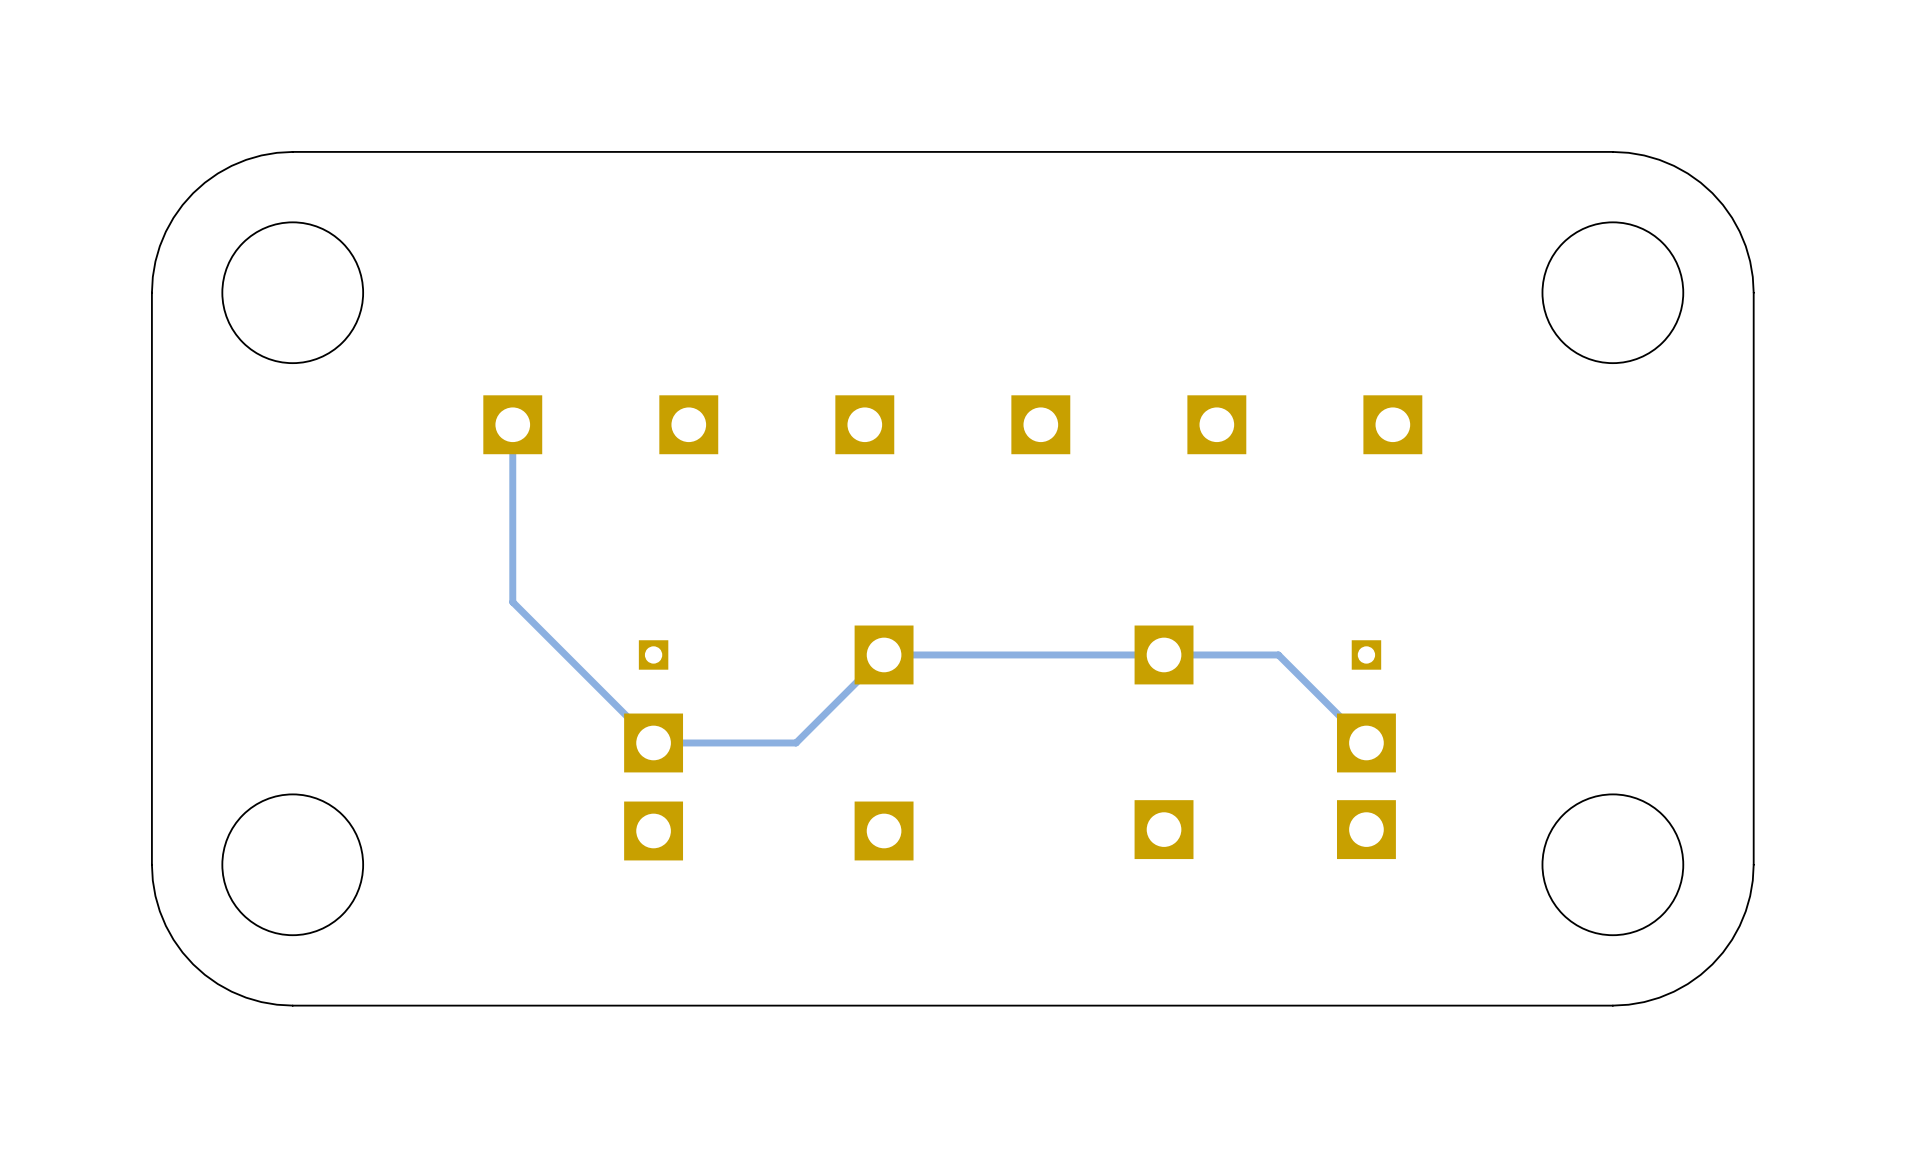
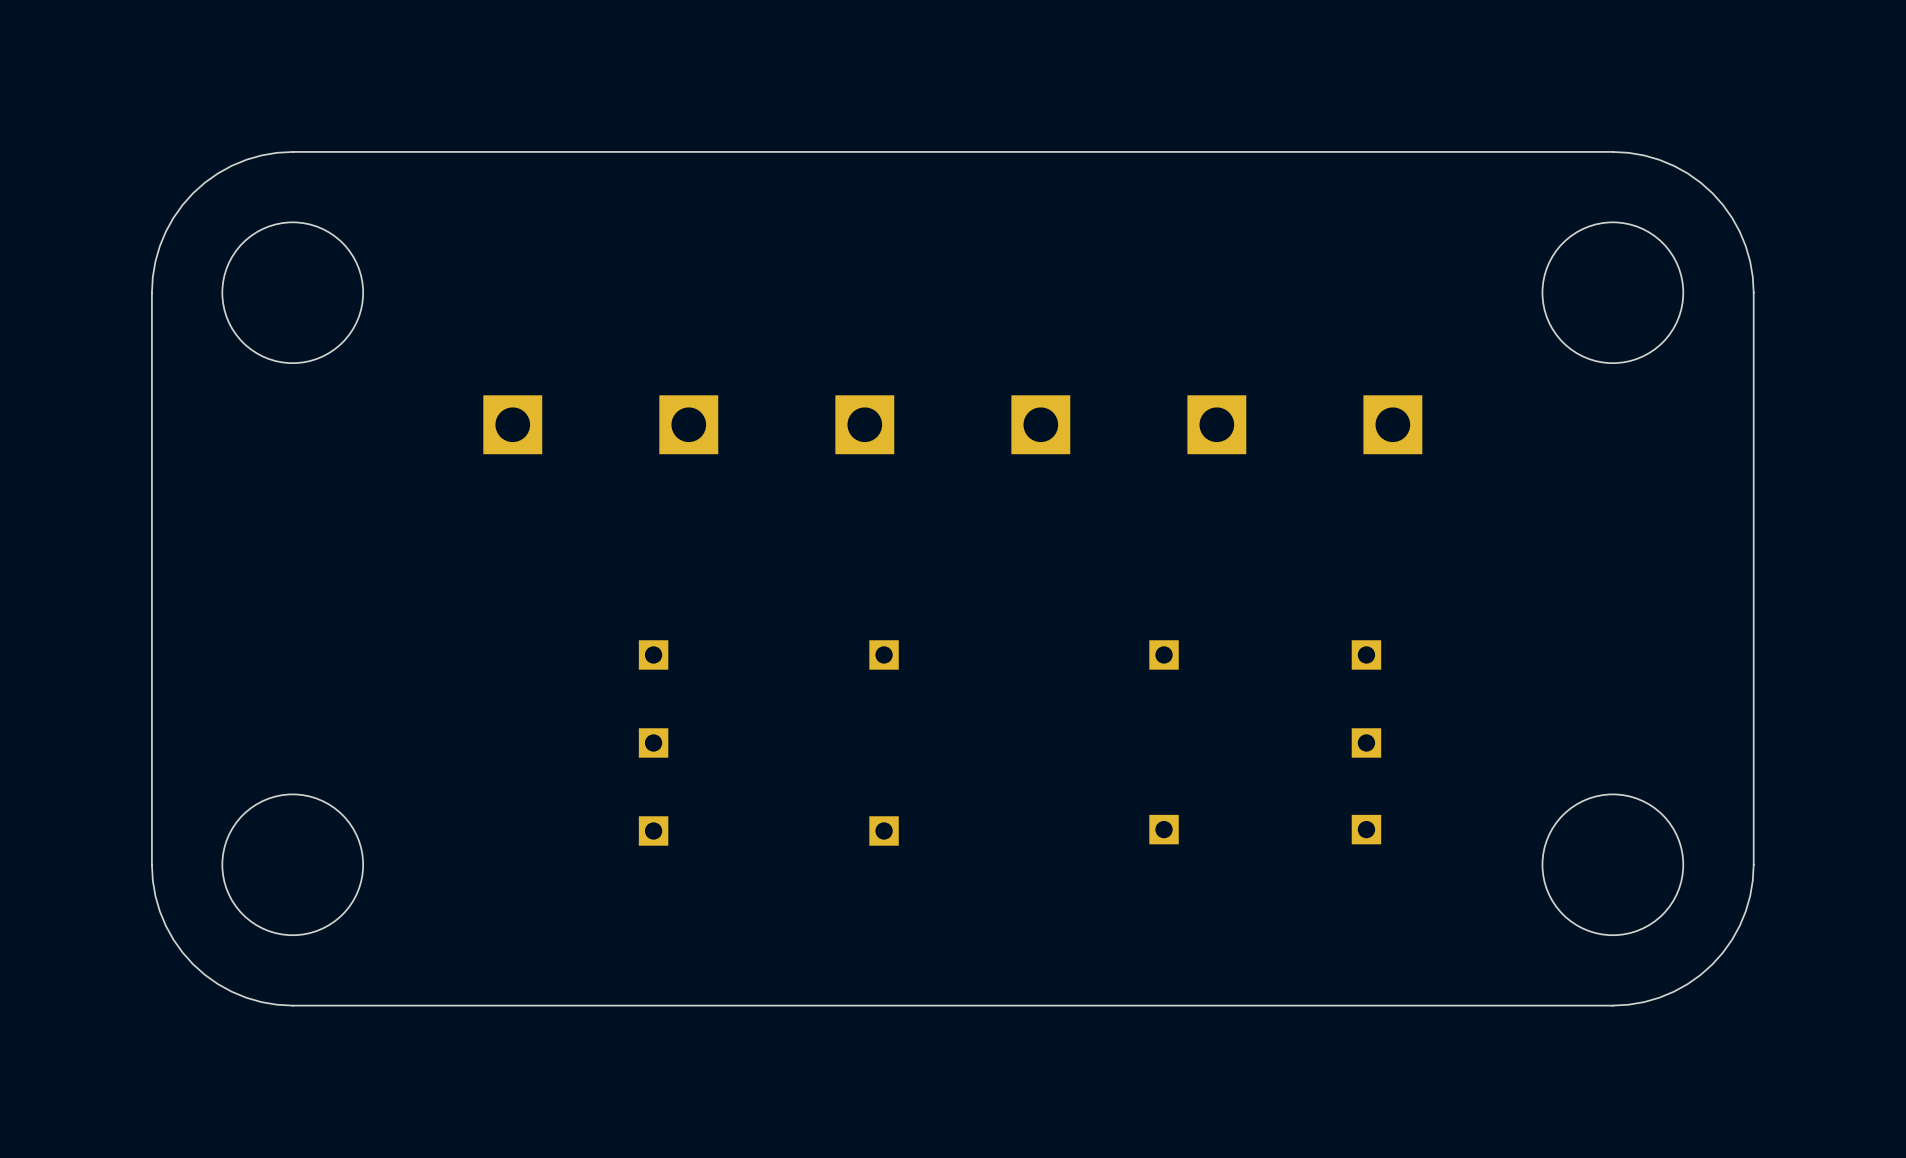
track: (512, 424) (512, 602) (653, 742) (796, 742) (884, 654) (1278, 654) (1366, 742) -> none
part footprint: [854, 625, 914, 685] -> [869, 640, 899, 670]
part footprint: [1134, 625, 1194, 685] -> [1149, 640, 1179, 670]
part footprint: [624, 713, 684, 773] -> [638, 728, 669, 758]
part footprint: [1337, 713, 1396, 773] -> [1351, 728, 1382, 758]
part footprint: [1134, 800, 1194, 860] -> [1149, 814, 1179, 845]
part footprint: [1337, 800, 1396, 860] -> [1351, 814, 1382, 845]
part footprint: [624, 801, 684, 861] -> [638, 816, 669, 846]
part footprint: [854, 801, 914, 861] -> [869, 816, 899, 846]

